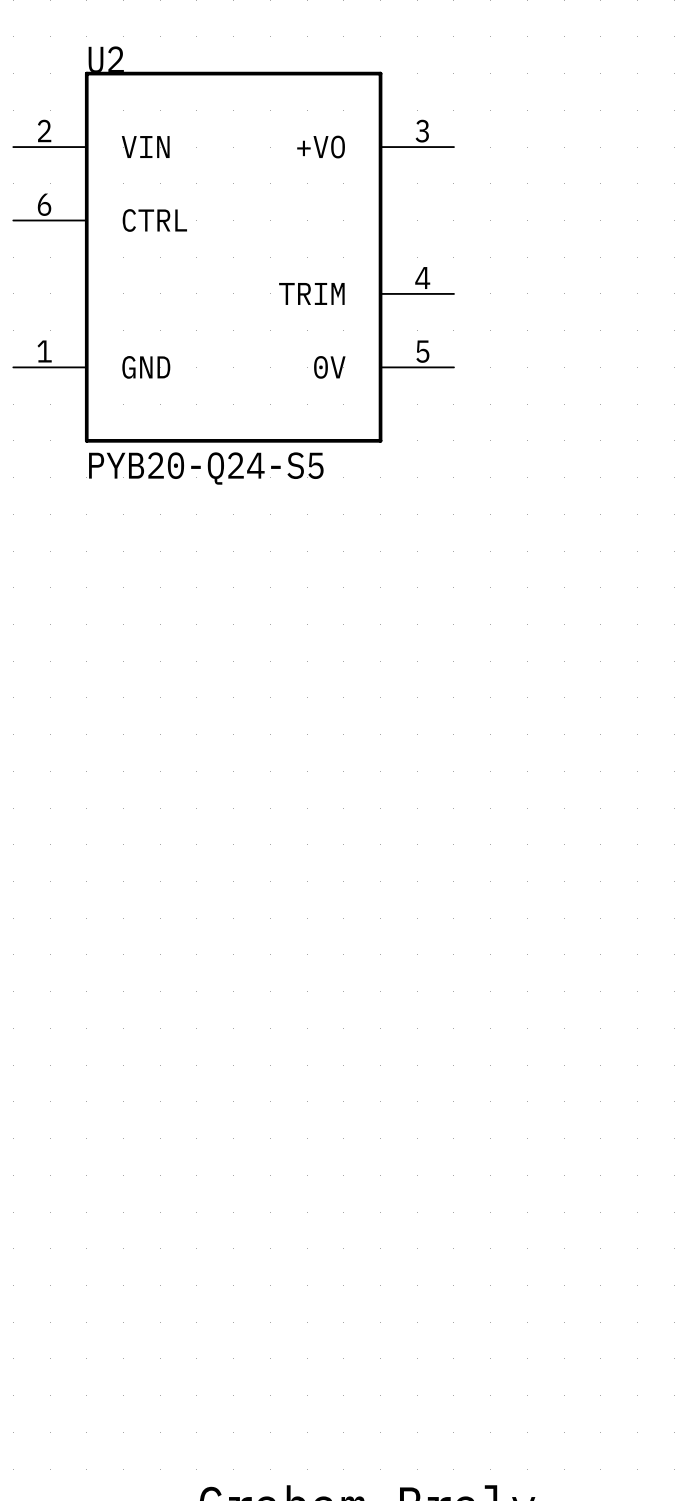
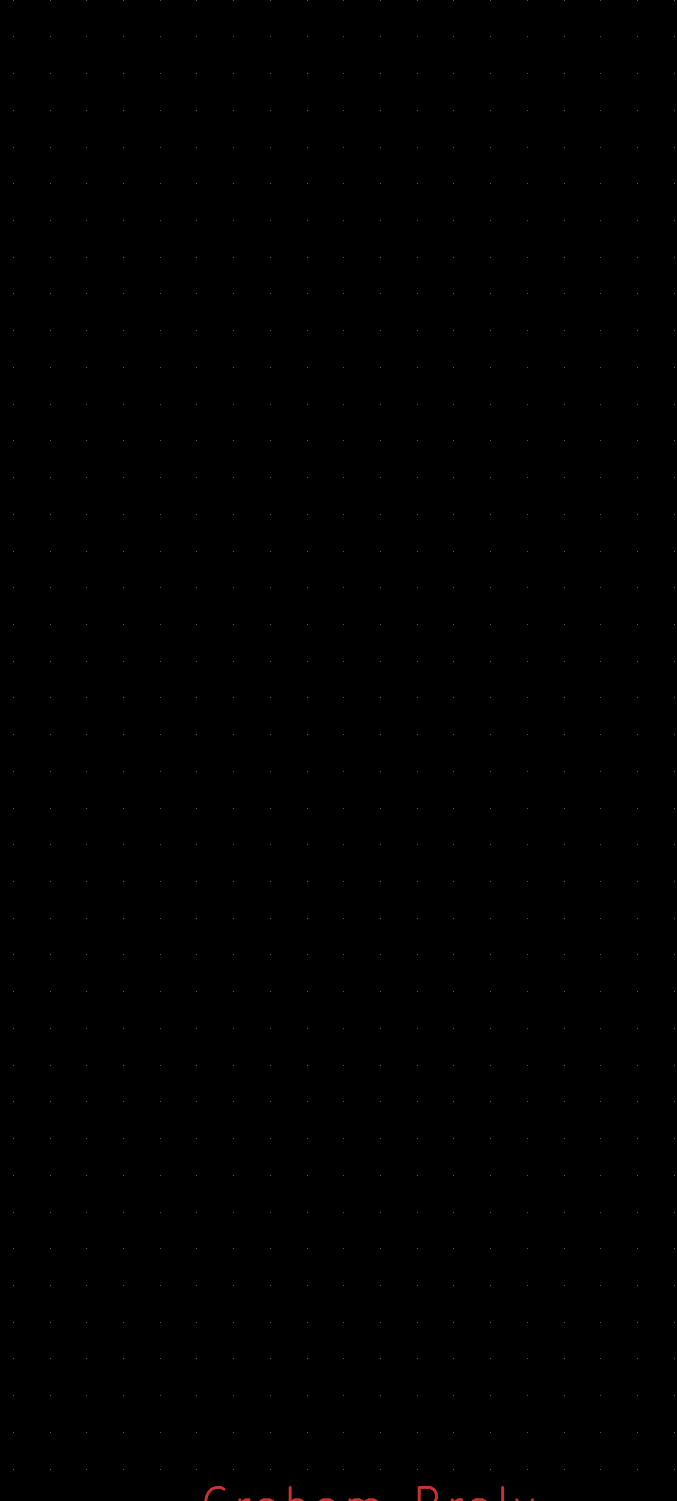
U2: PYB20-Q24-S5 (233, 257) -> none

